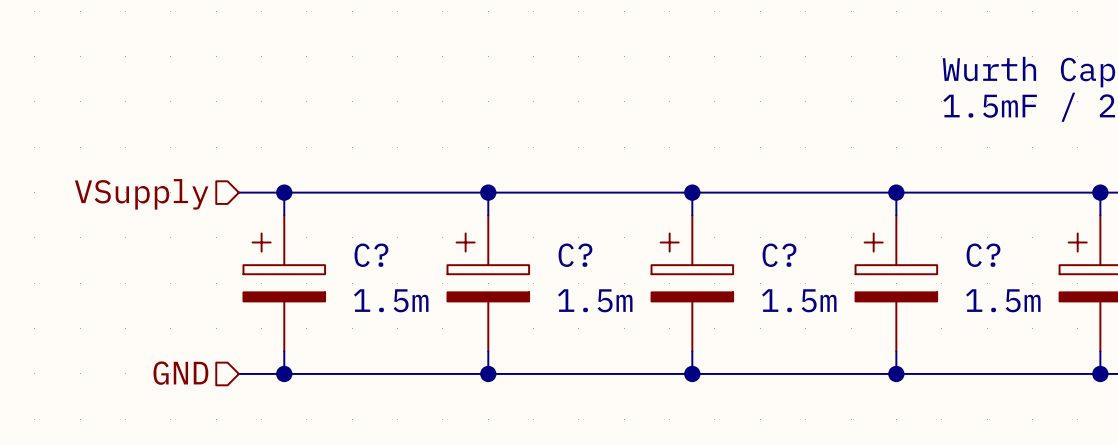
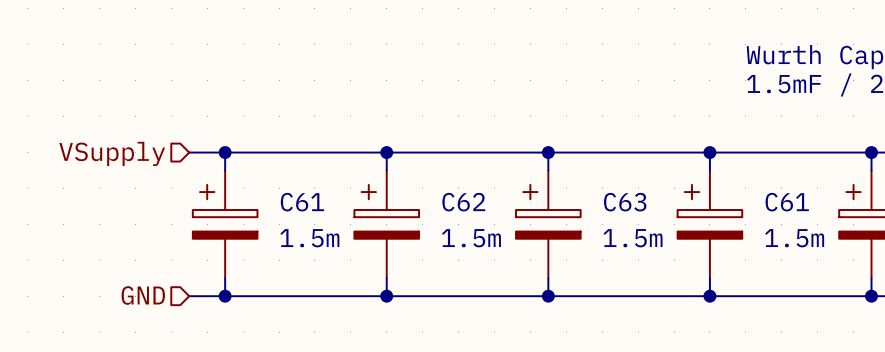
C? name: C? (371, 255) -> C61 (302, 202)
C? name: C? (575, 255) -> C62 (463, 202)
C? name: C? (779, 255) -> C63 (625, 202)
C? name: C? (983, 255) -> C61 (787, 202)

